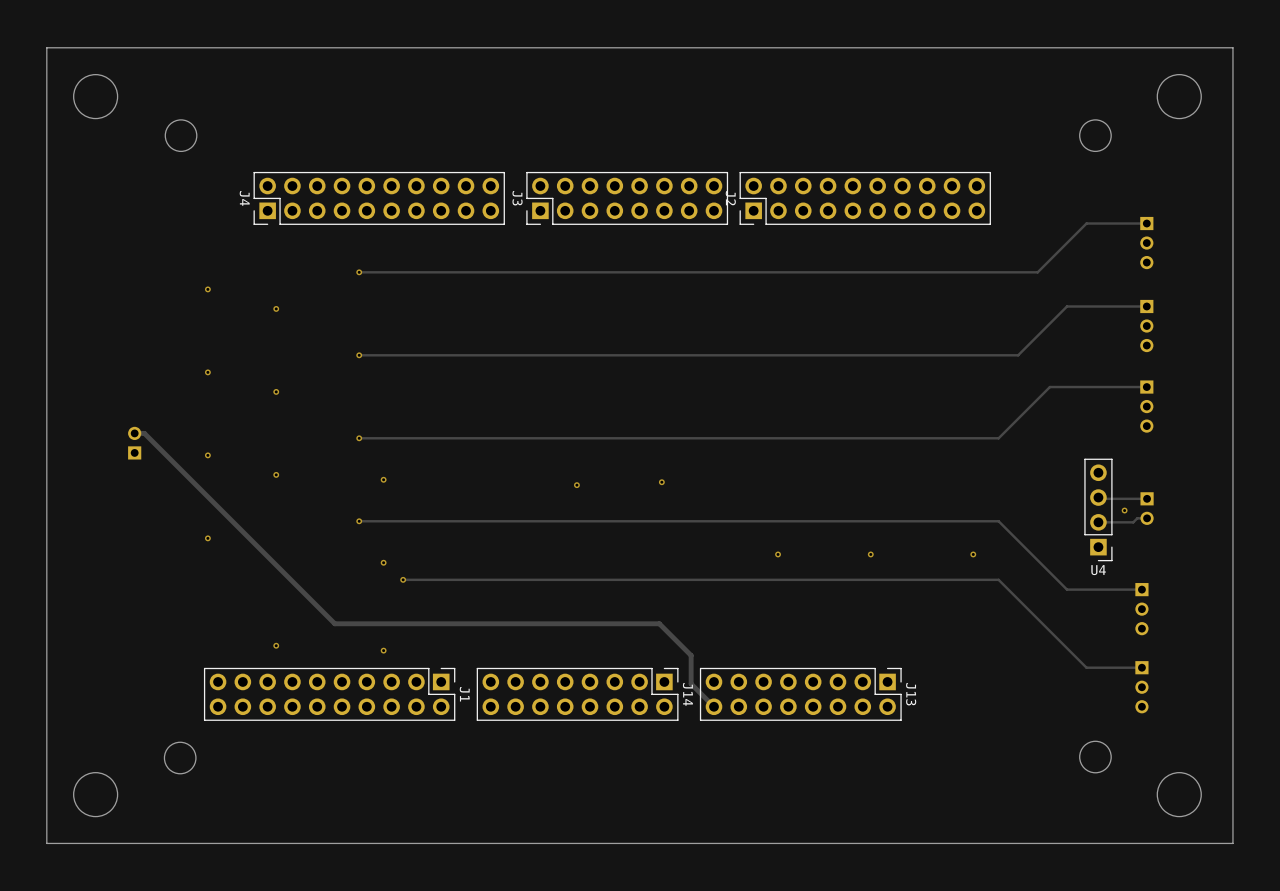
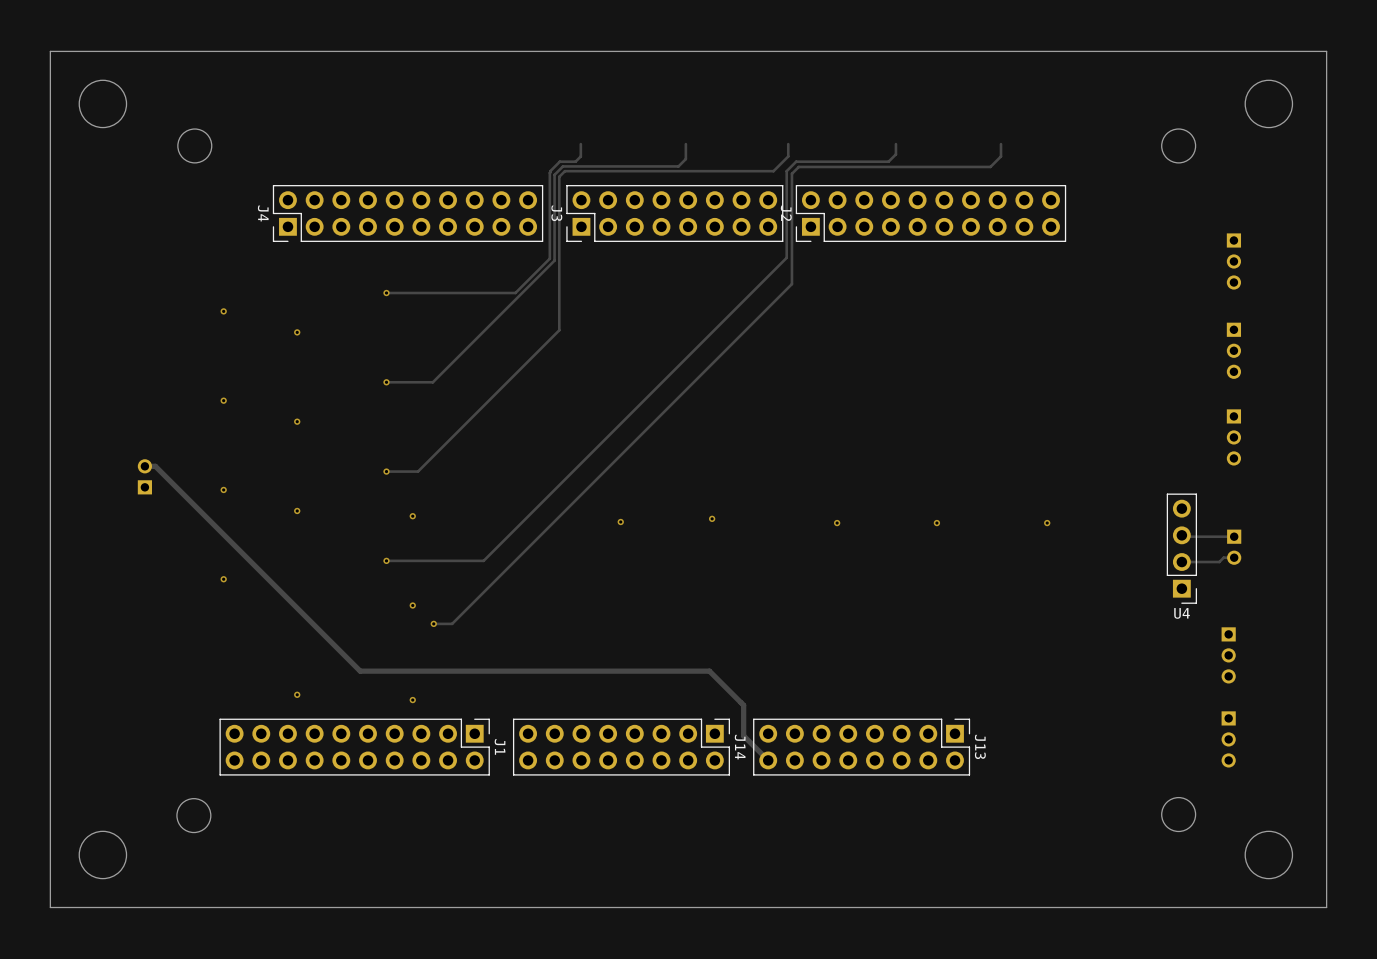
track: (1146, 223) (1086, 223) (1037, 272) (479, 272) -> (580, 144) (580, 156) (575, 161) (559, 161) (549, 172) (549, 258) (515, 293)
track: (1146, 306) (1067, 306) (1018, 355) (402, 355) -> (685, 144) (685, 159) (678, 166) (562, 166) (554, 174) (554, 260) (432, 382)
track: (1146, 387) (1049, 387) (998, 438) (388, 438) -> (788, 144) (788, 156) (773, 171) (564, 171) (559, 176) (559, 330) (418, 471)
via: none -> (837, 523)
via: none -> (936, 523)
via: none -> (1047, 523)
via: (1124, 510) -> none
track: (449, 521) (998, 521) (1067, 589) (1141, 589) -> (483, 560) (786, 257) (786, 171) (796, 161) (888, 161) (895, 154) (895, 144)
via: (778, 554) -> none
via: (870, 554) -> none
via: (973, 554) -> none
track: (420, 579) (998, 579) (1086, 667) (1141, 667) -> (452, 623) (791, 284) (791, 173) (798, 166) (990, 166) (1000, 156) (1000, 144)

